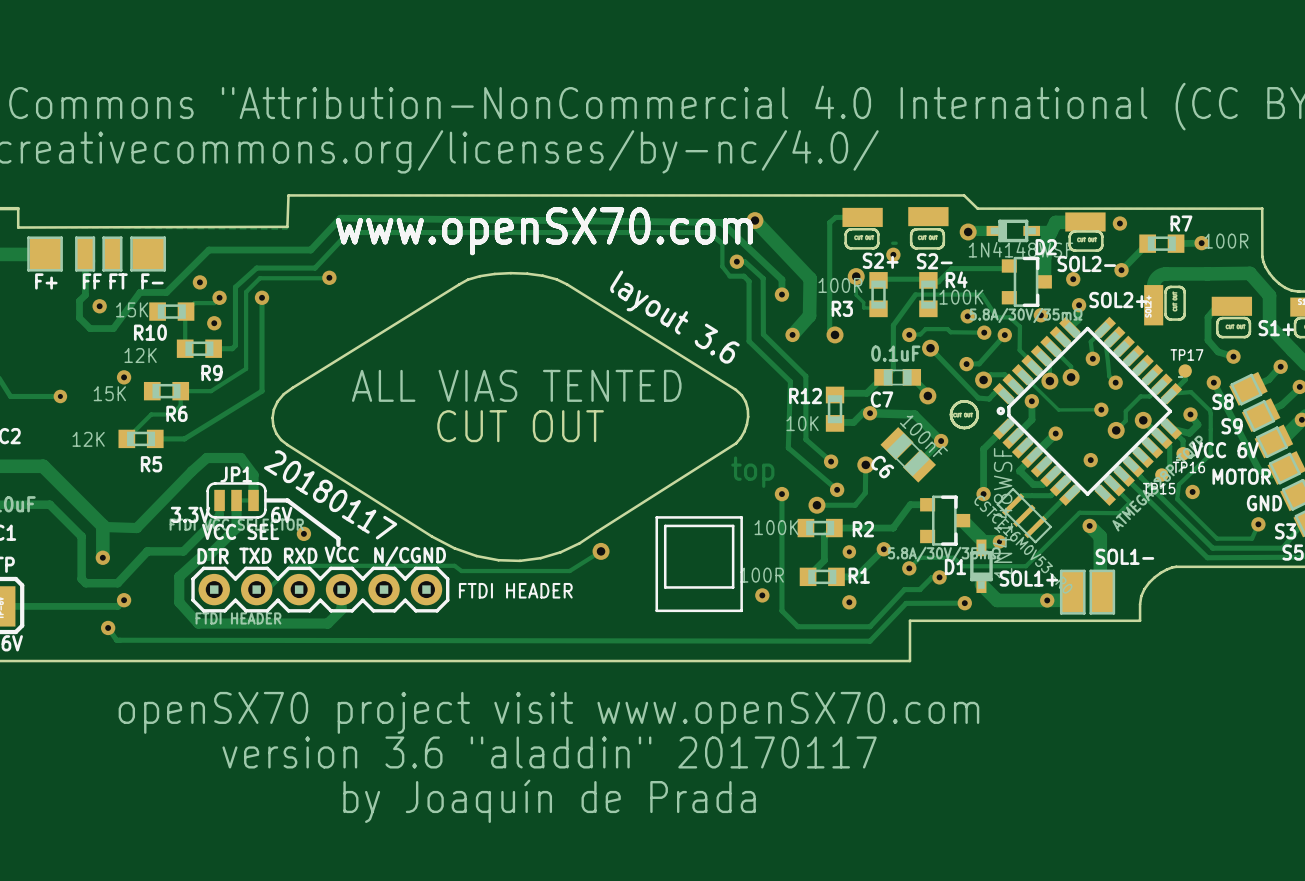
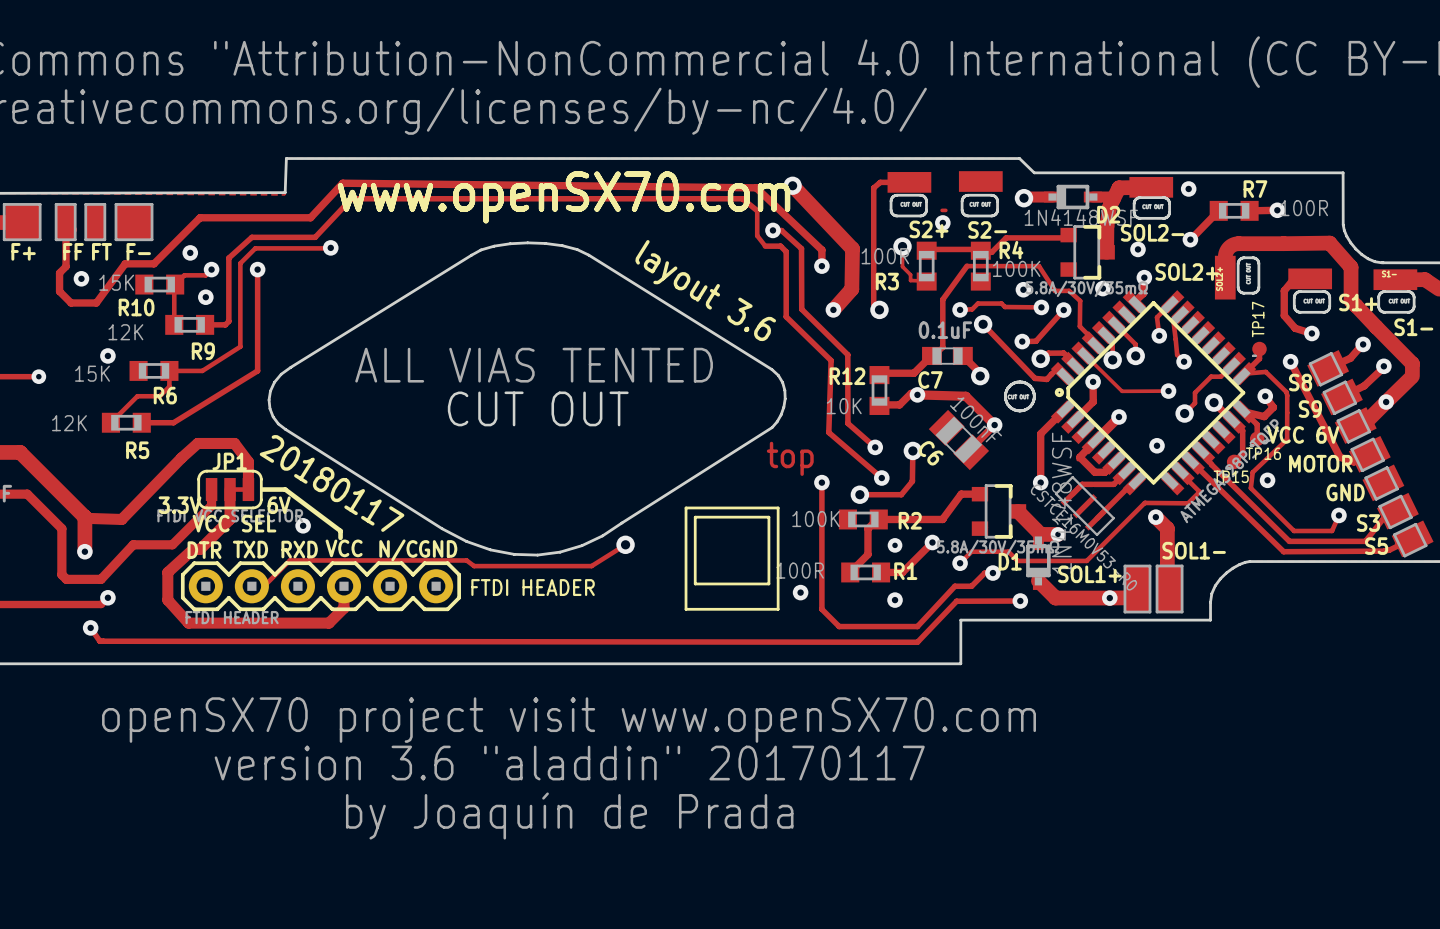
TP17 name rotation: 0° (1186, 354) -> 90° counterclockwise (1258, 319)

